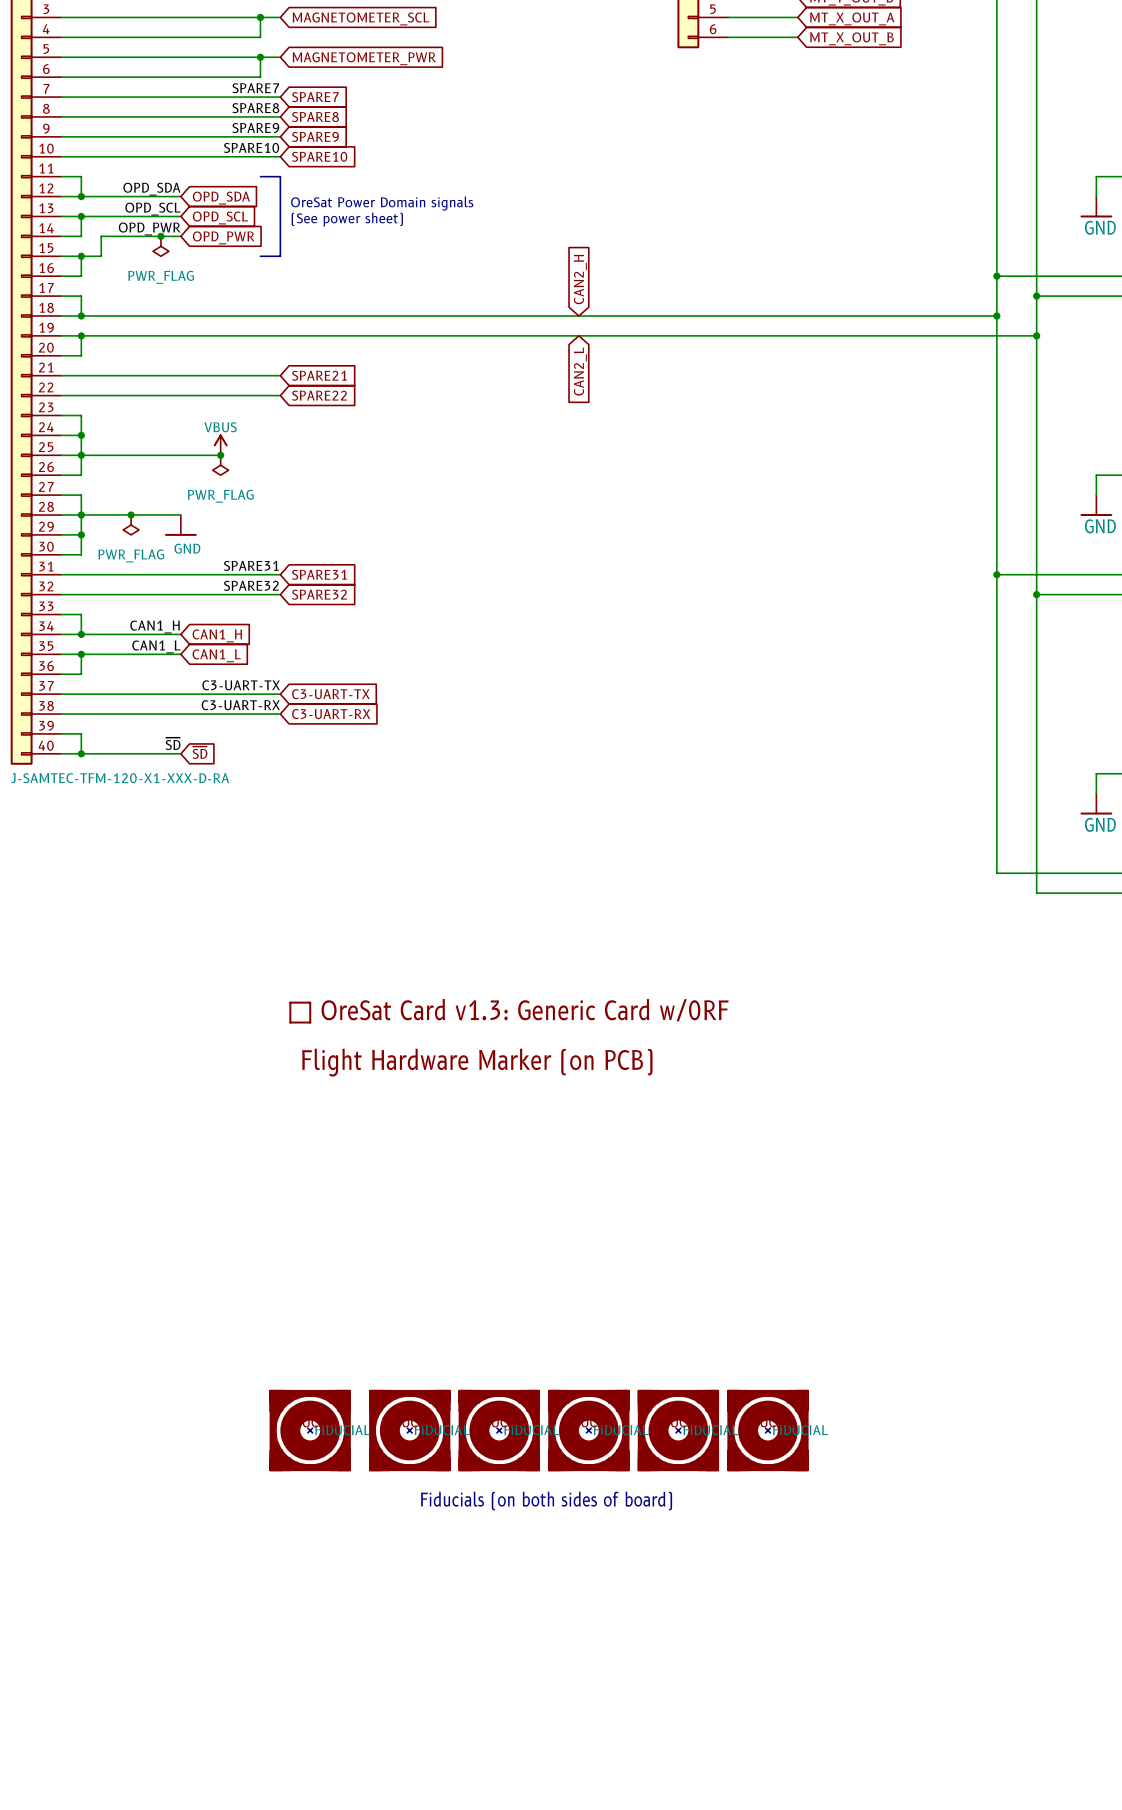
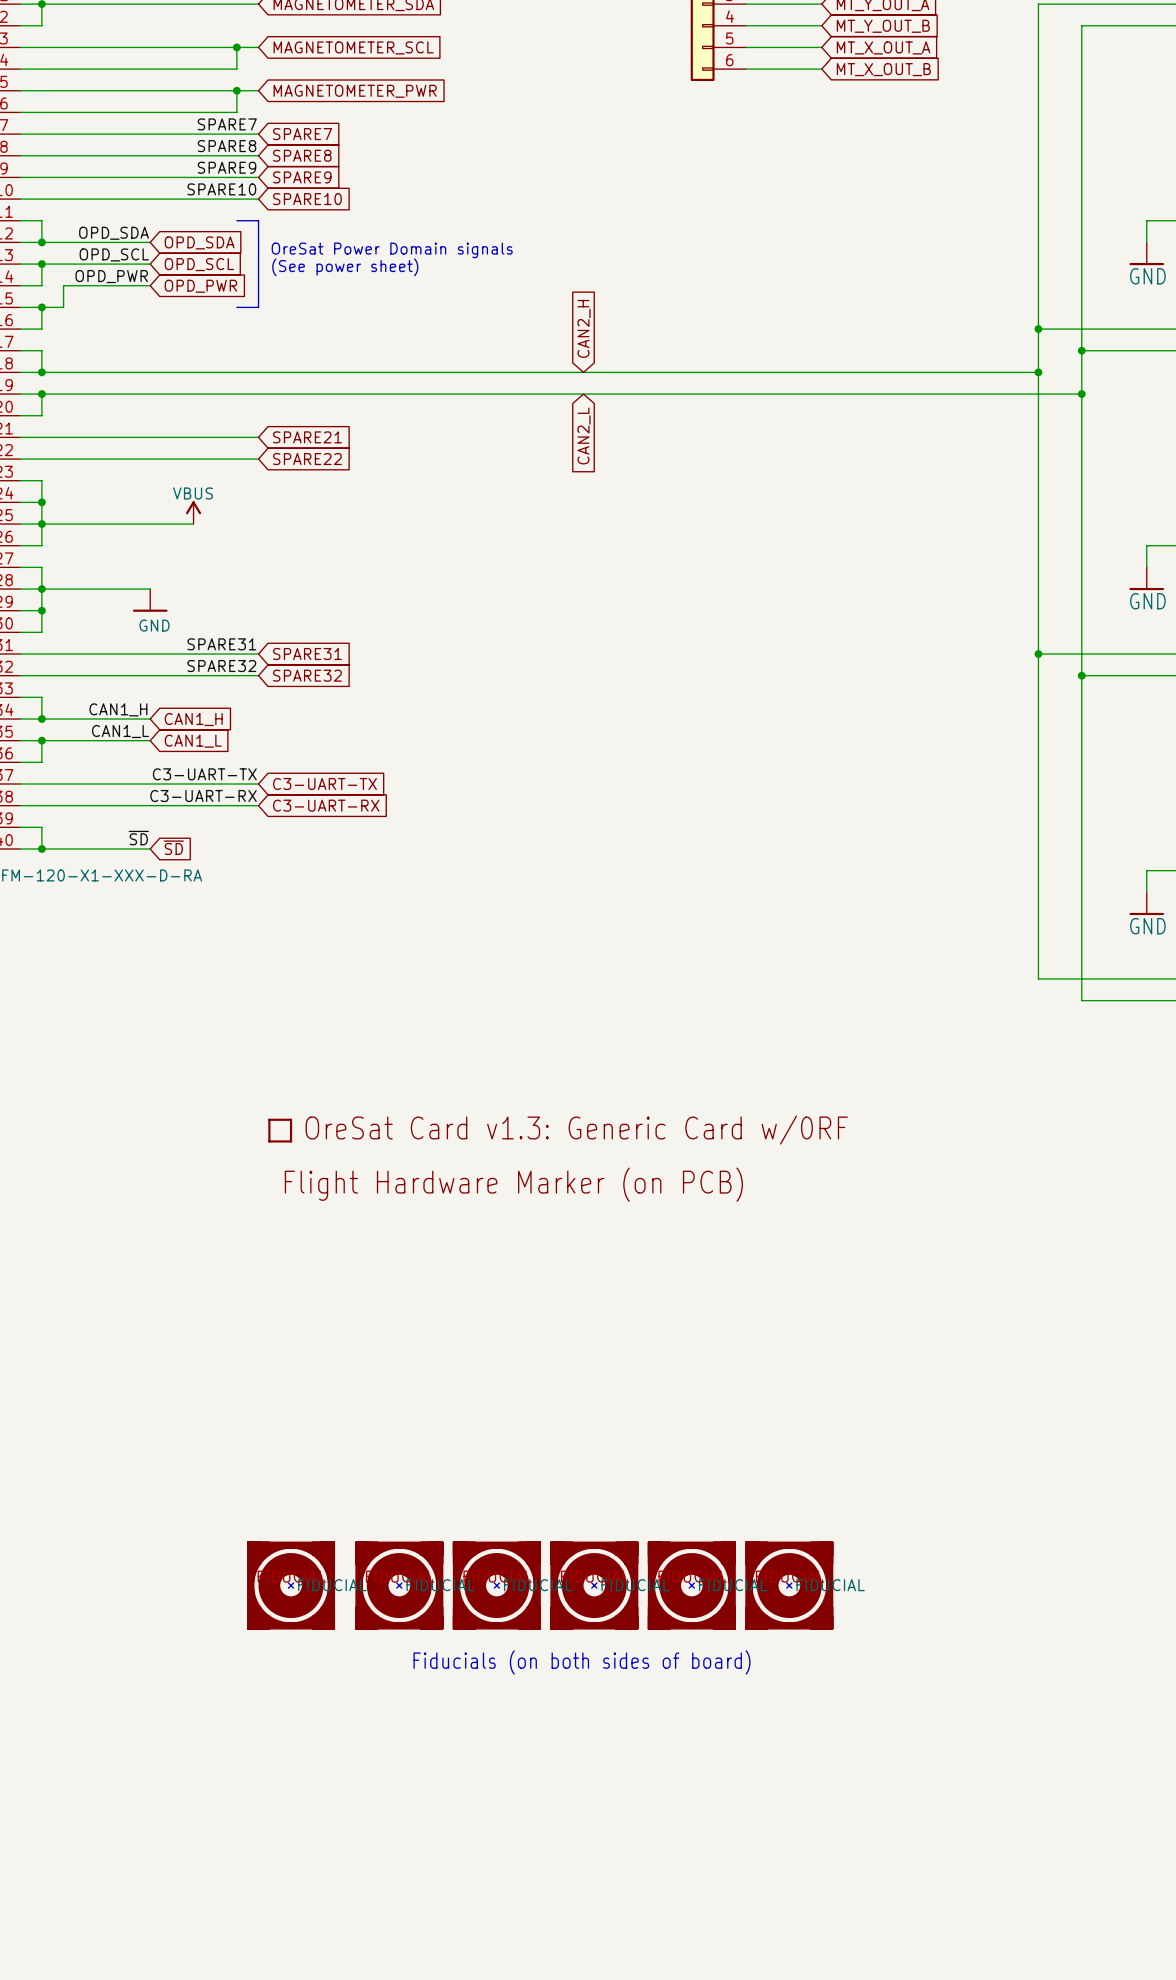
junction: (160, 236) -> none
power symbol: PWR_FLAG (160, 246) -> none
junction: (220, 455) -> none
power symbol: PWR_FLAG (220, 465) -> none
junction: (131, 515) -> none
power symbol: PWR_FLAG (131, 524) -> none

